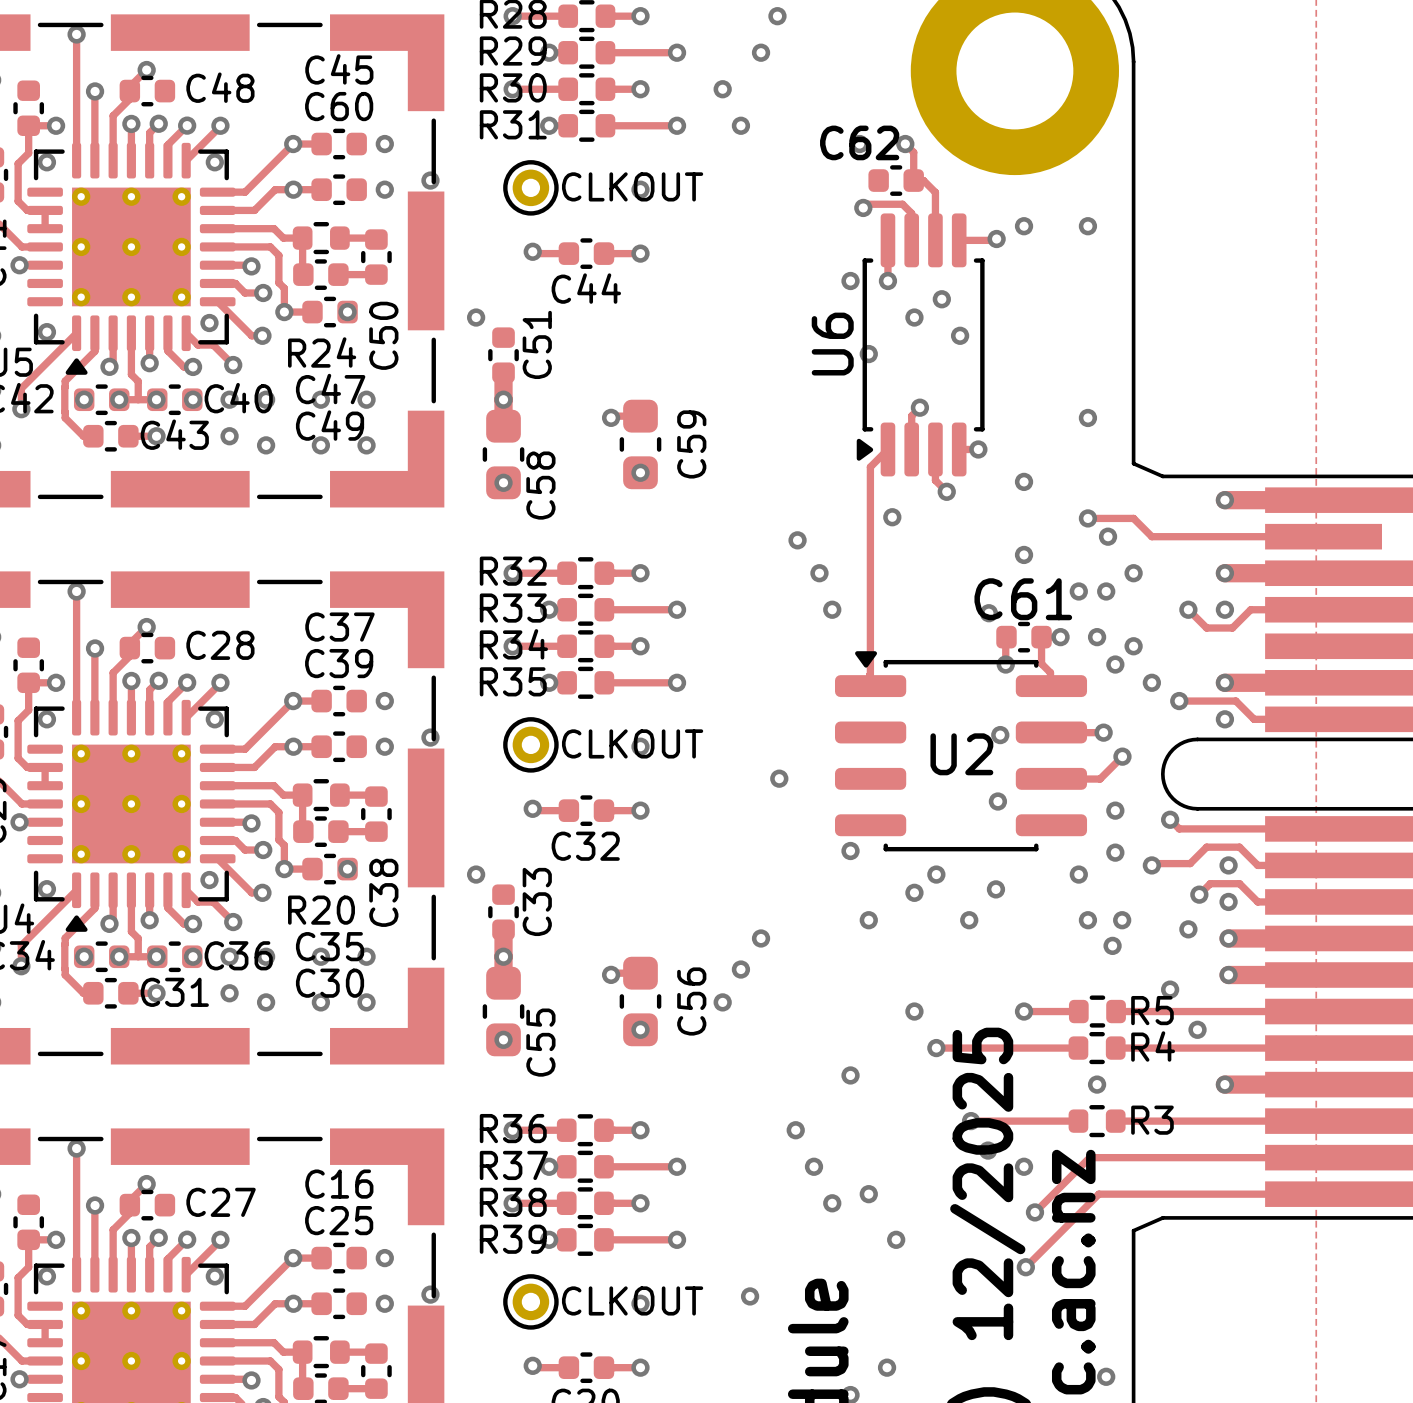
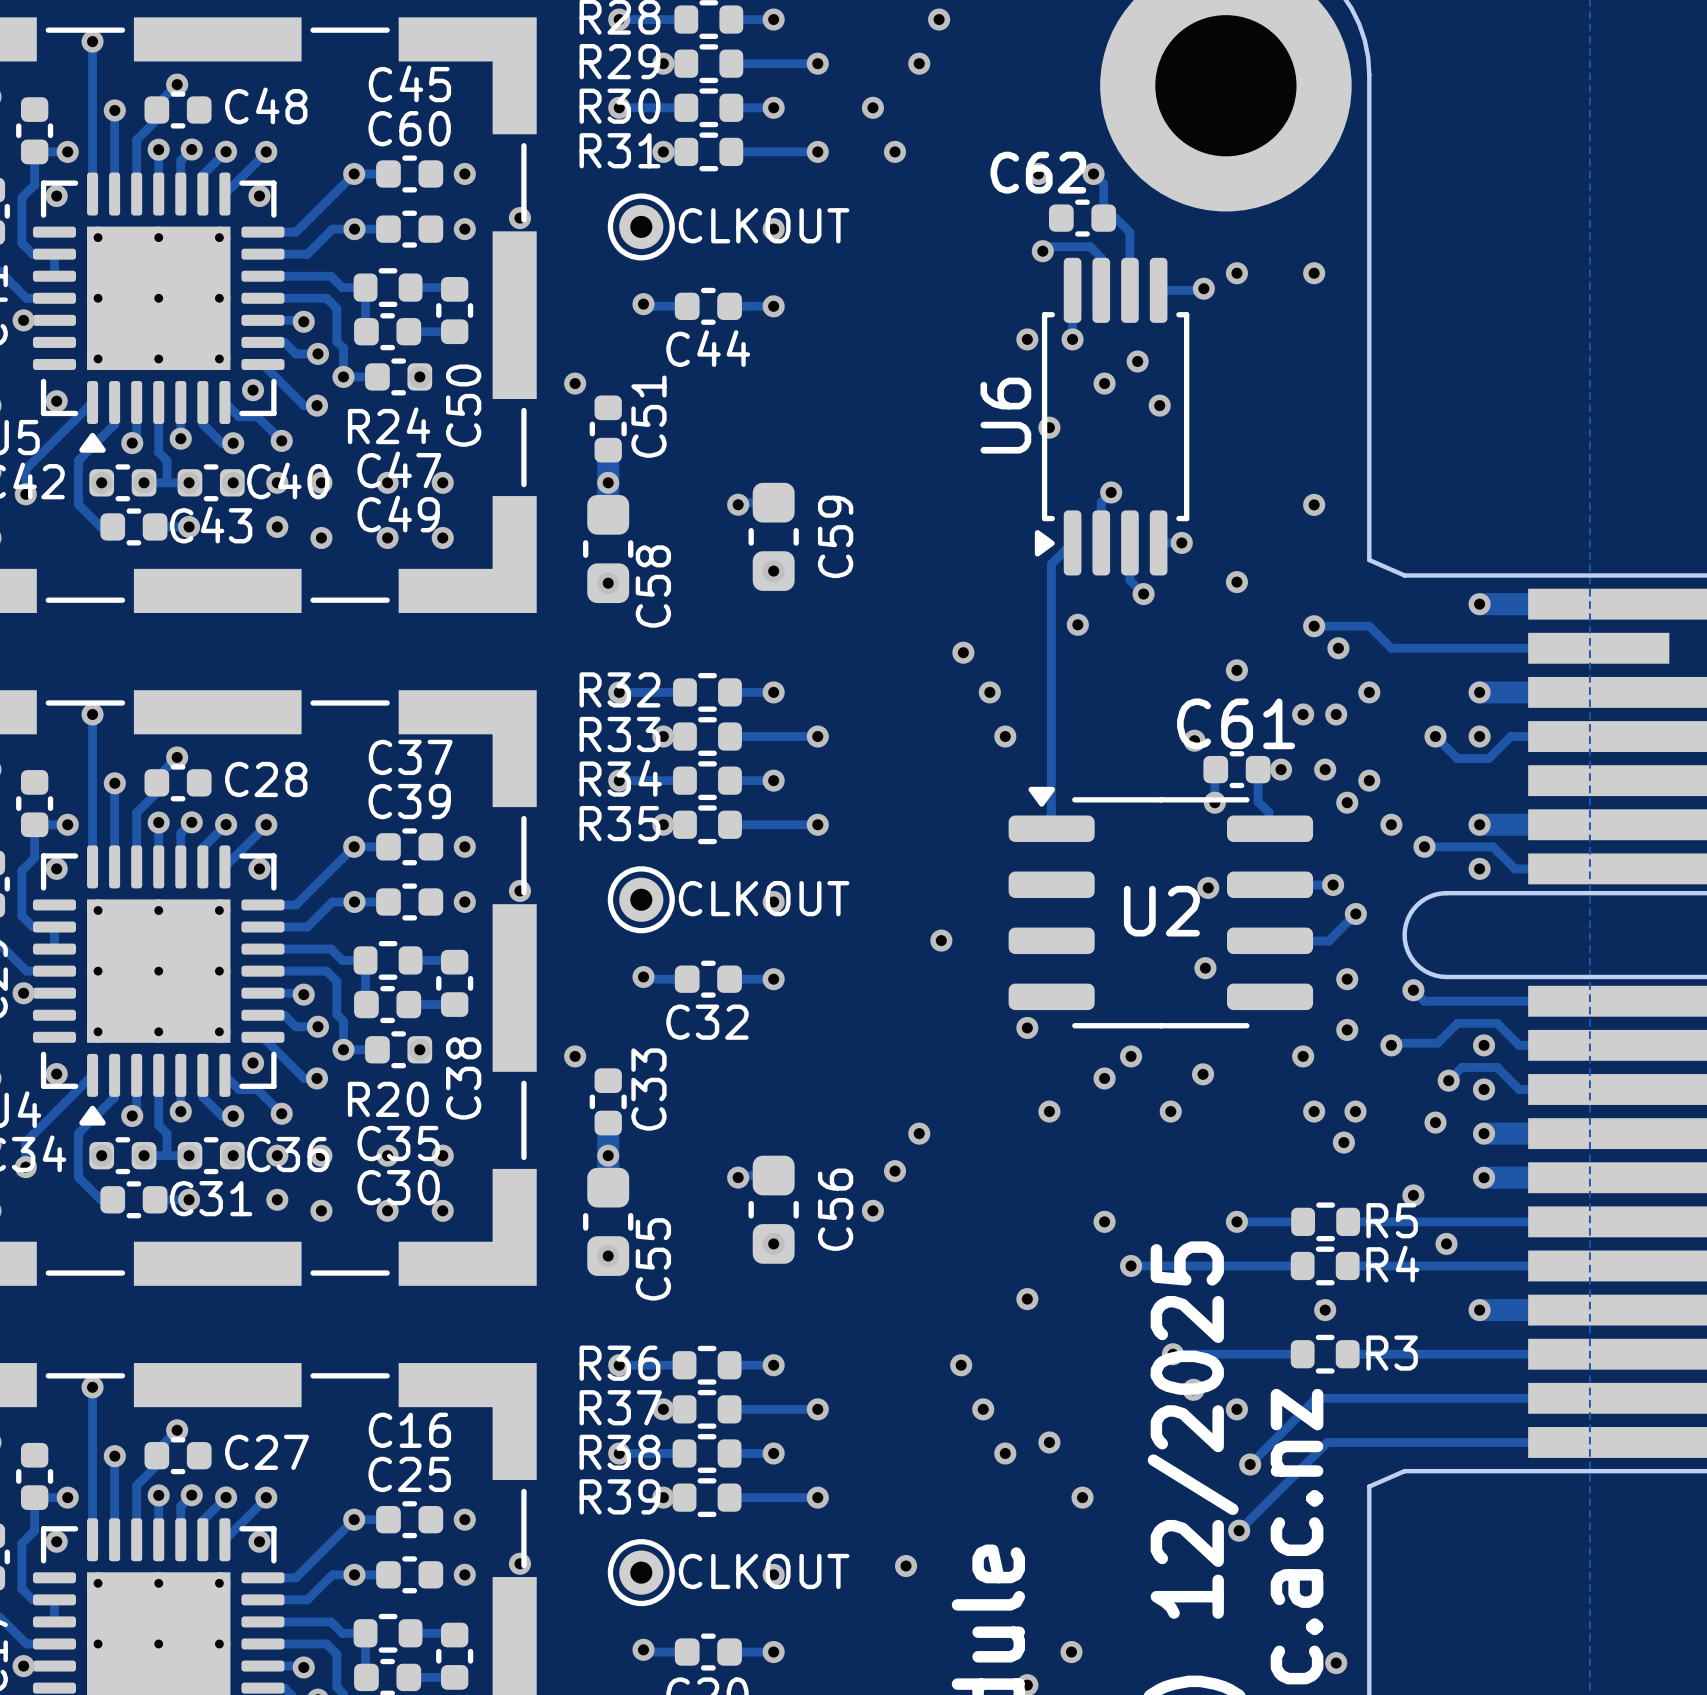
U2 footprint: [835, 651, 1088, 852] -> [1008, 786, 1314, 1029]

